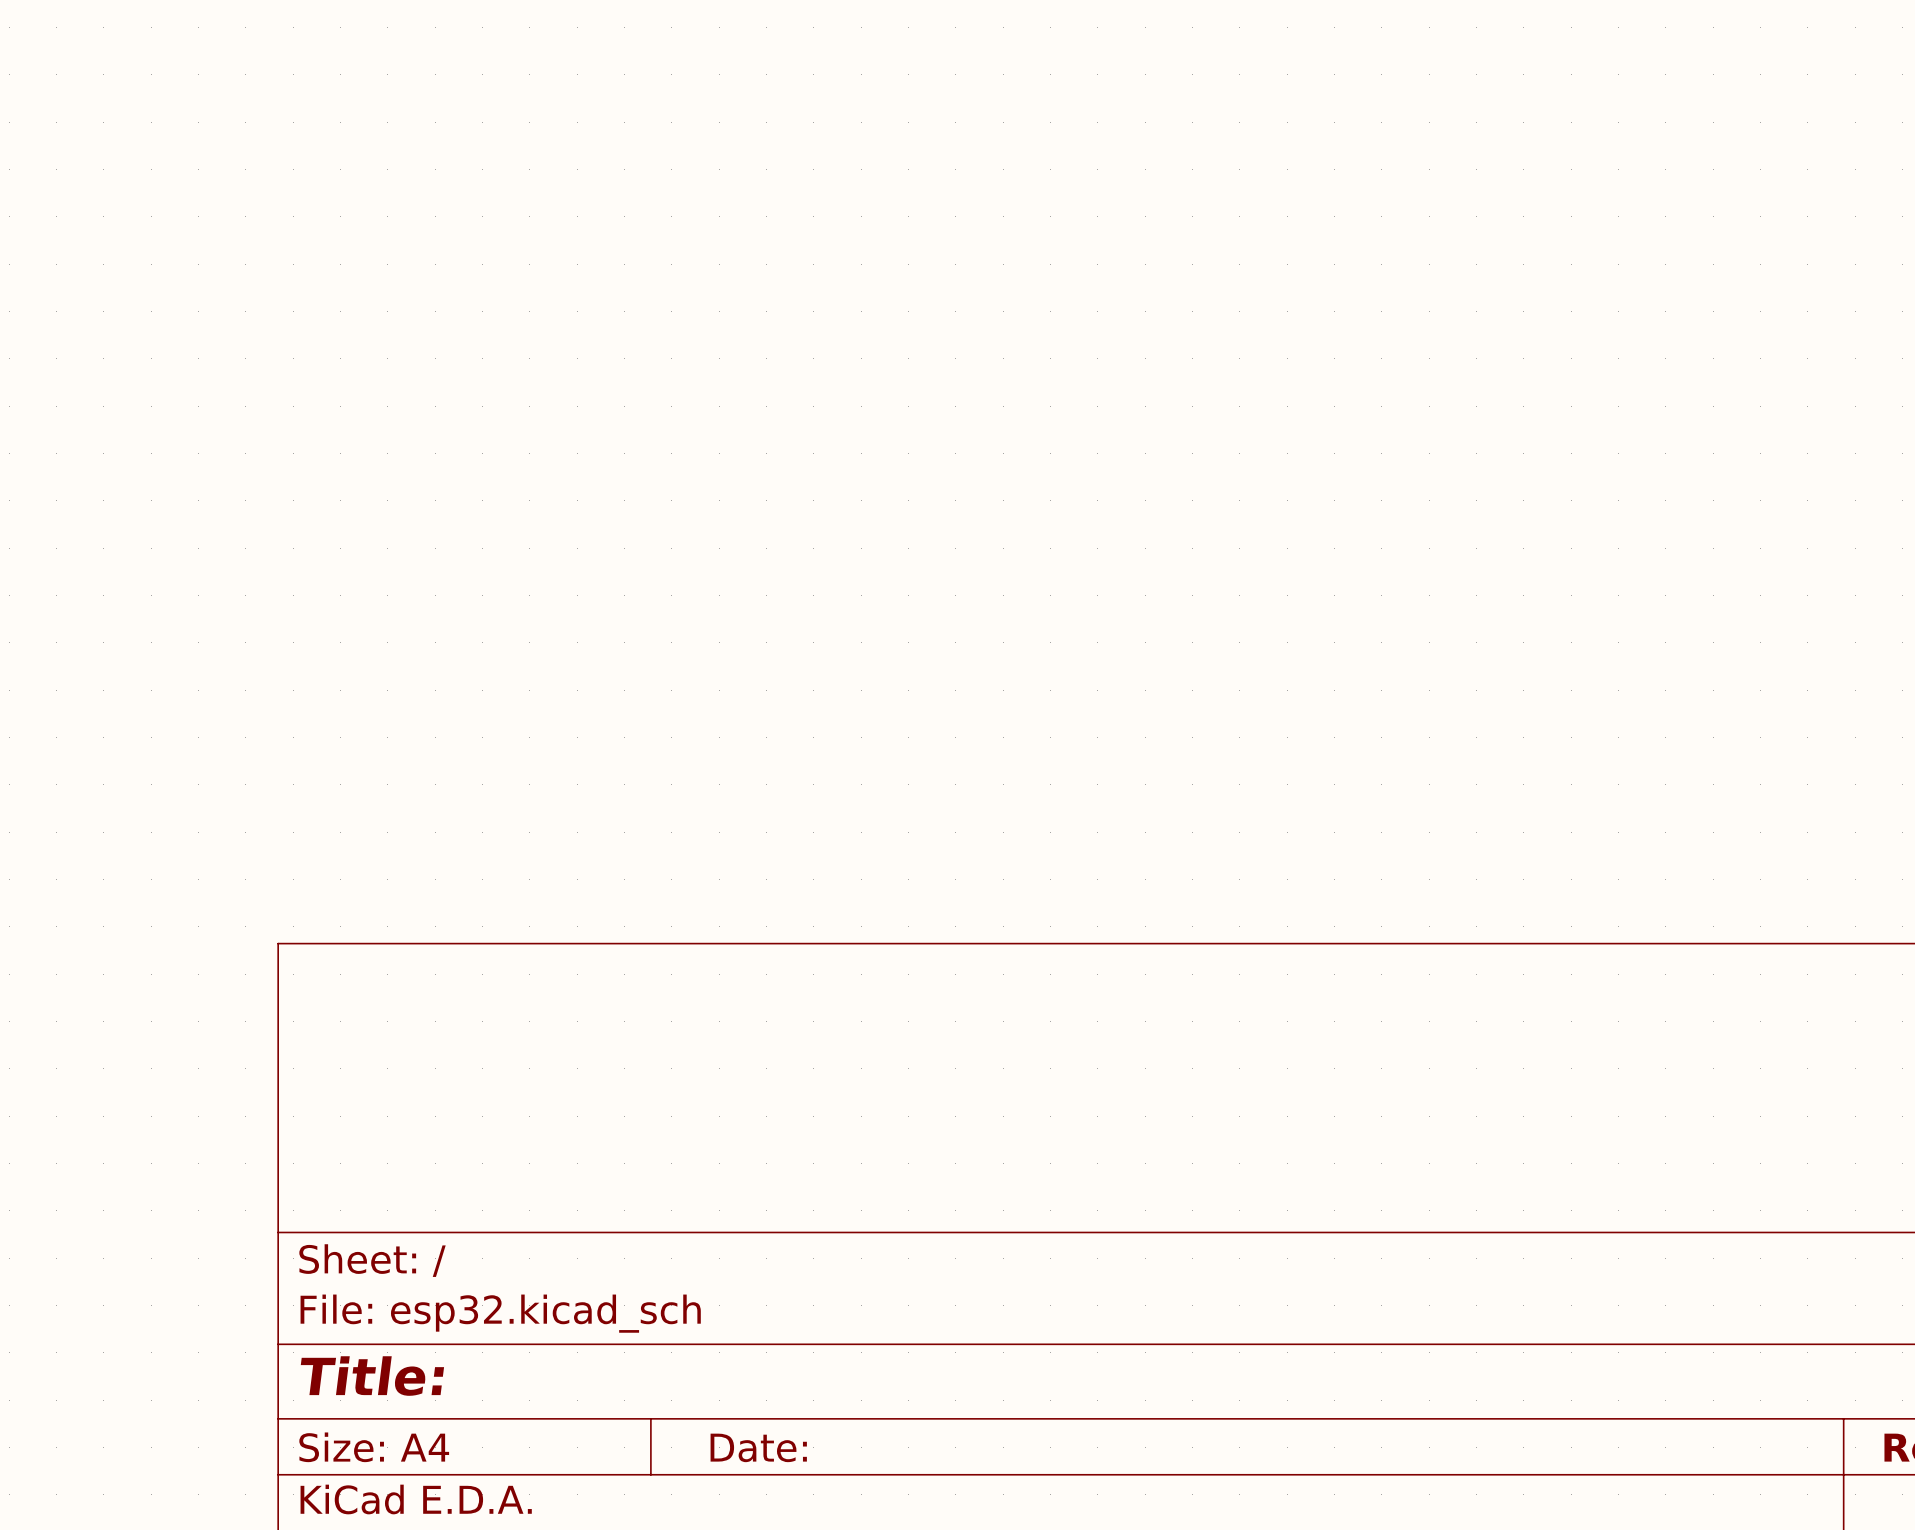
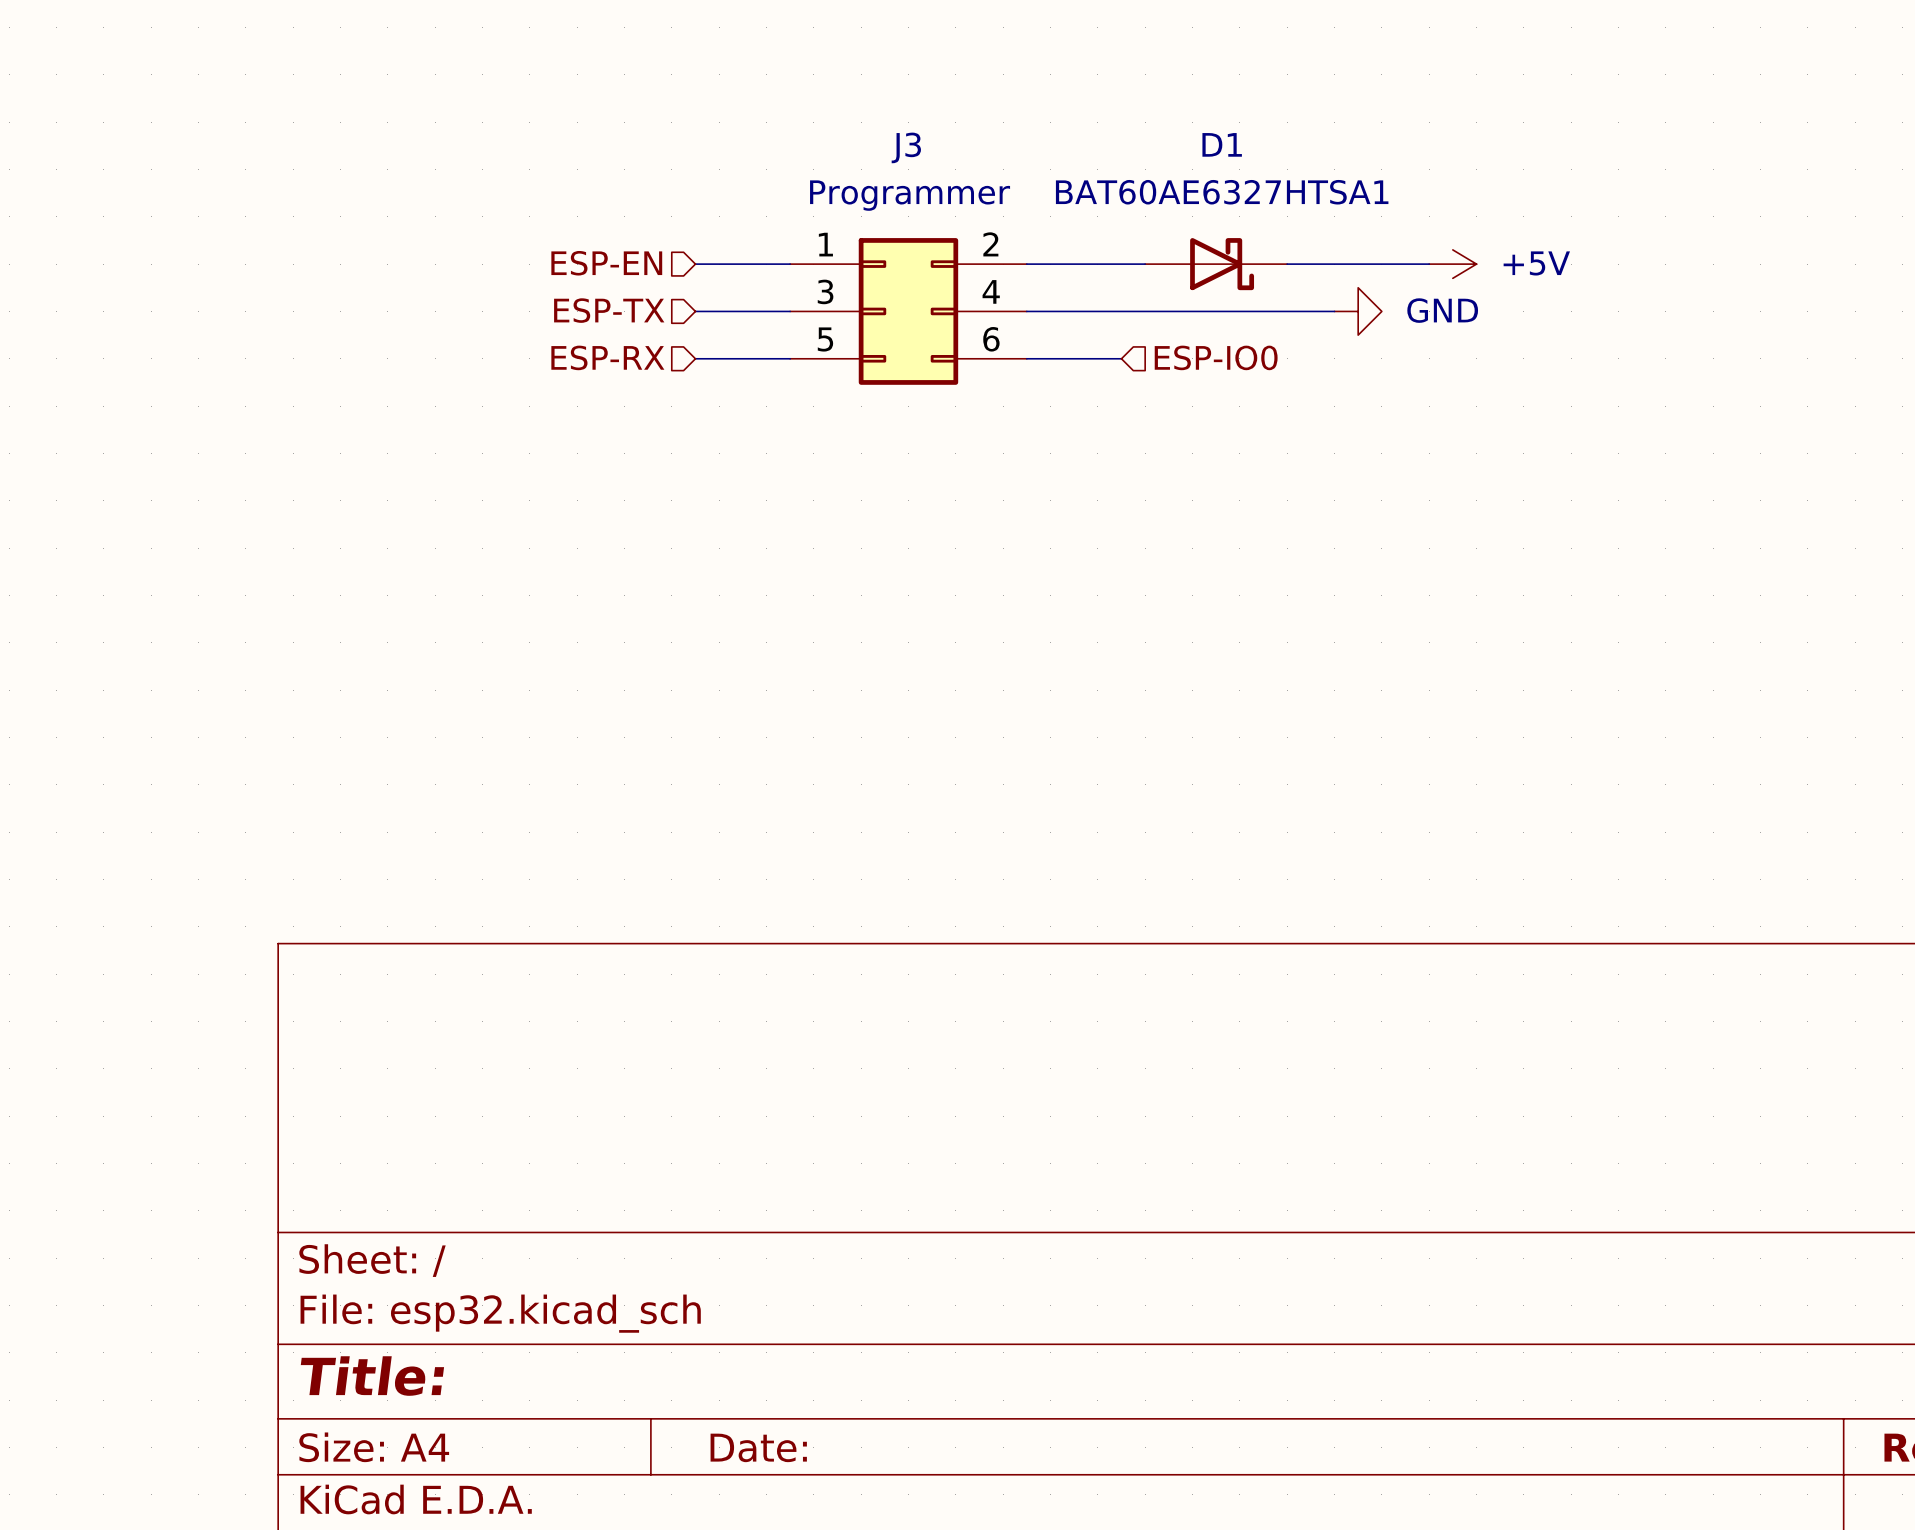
hierarchical label: none -> ESP-EN (606, 263)
wire: none -> (695, 264) (790, 264)
wire: none -> (1026, 264) (1145, 264)
D1: none -> BAT60AE6327HTSA1 (1216, 264)
wire: none -> (1287, 264) (1429, 264)
power symbol: none -> +5V (1452, 264)
hierarchical label: none -> ESP-TX (609, 310)
wire: none -> (695, 311) (790, 311)
J3: none -> Programmer (908, 311)
wire: none -> (1026, 311) (1334, 311)
power symbol: none -> GND (1358, 311)
hierarchical label: none -> ESP-RX (607, 357)
hierarchical label: none -> ESP-IO0 (1216, 357)
wire: none -> (695, 358) (790, 358)
wire: none -> (1026, 358) (1121, 358)

